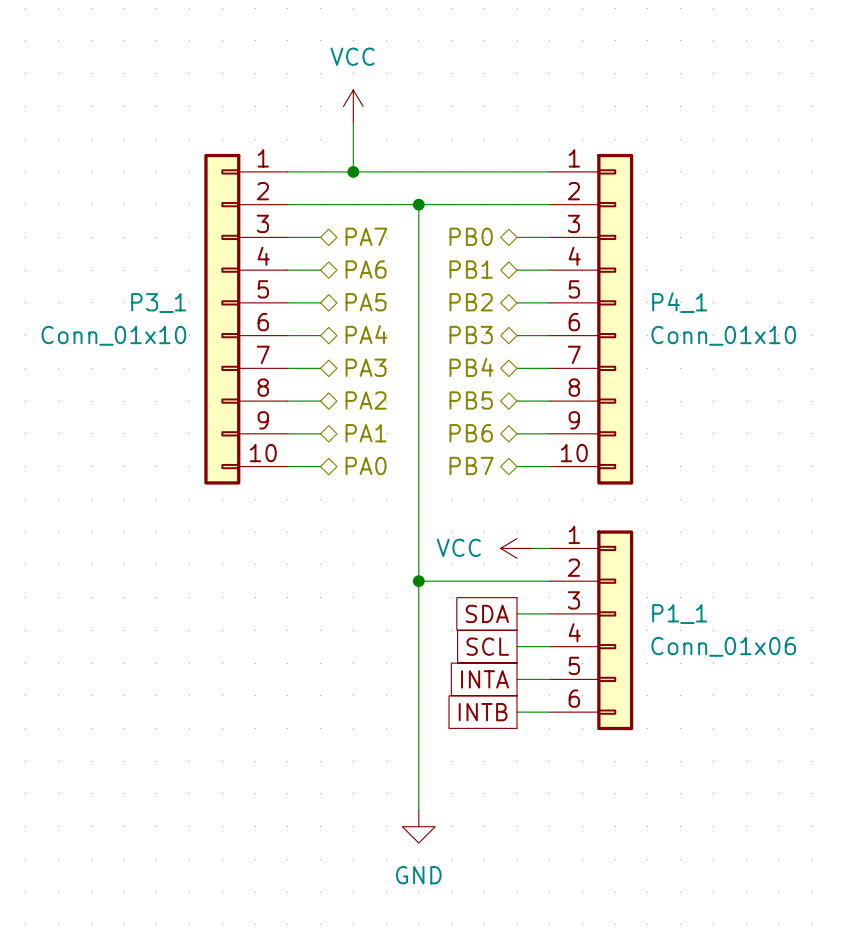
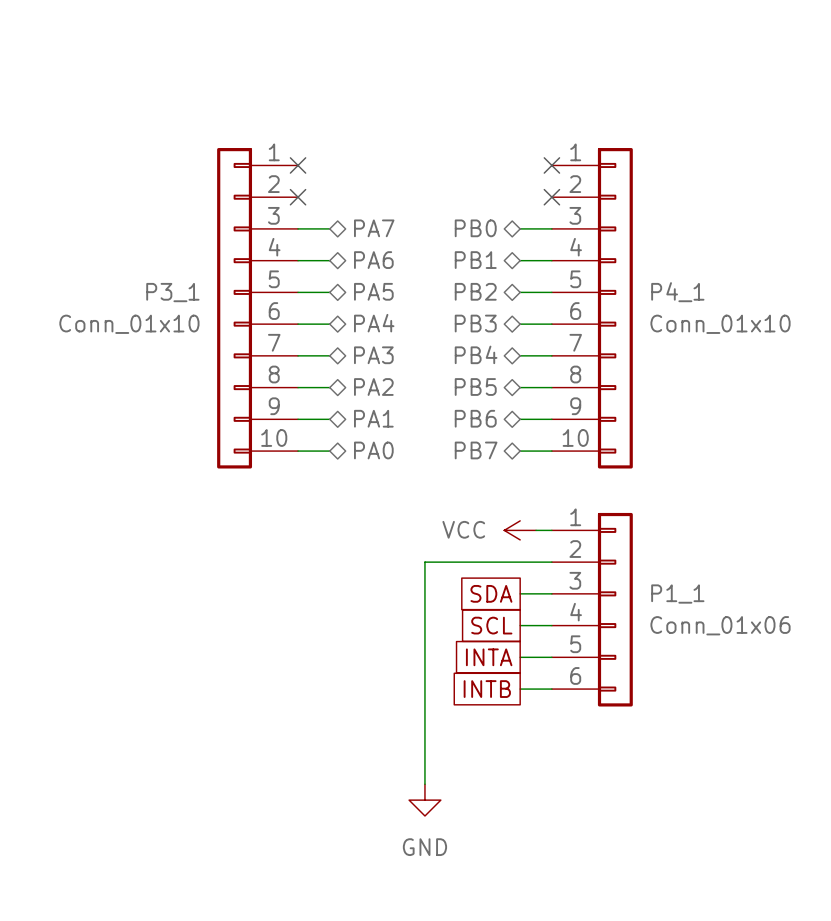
power symbol: VCC (353, 106) -> none
wire: (353, 122) (353, 171) -> none
wire: (287, 171) (549, 171) -> none
no-connect mark: none -> (298, 165)
junction: (353, 171) -> none
no-connect mark: none -> (551, 165)
wire: (287, 204) (549, 204) -> none
no-connect mark: none -> (298, 197)
wire: (418, 204) (418, 581) -> none
junction: (418, 204) -> none
no-connect mark: none -> (551, 197)
junction: (418, 581) -> none

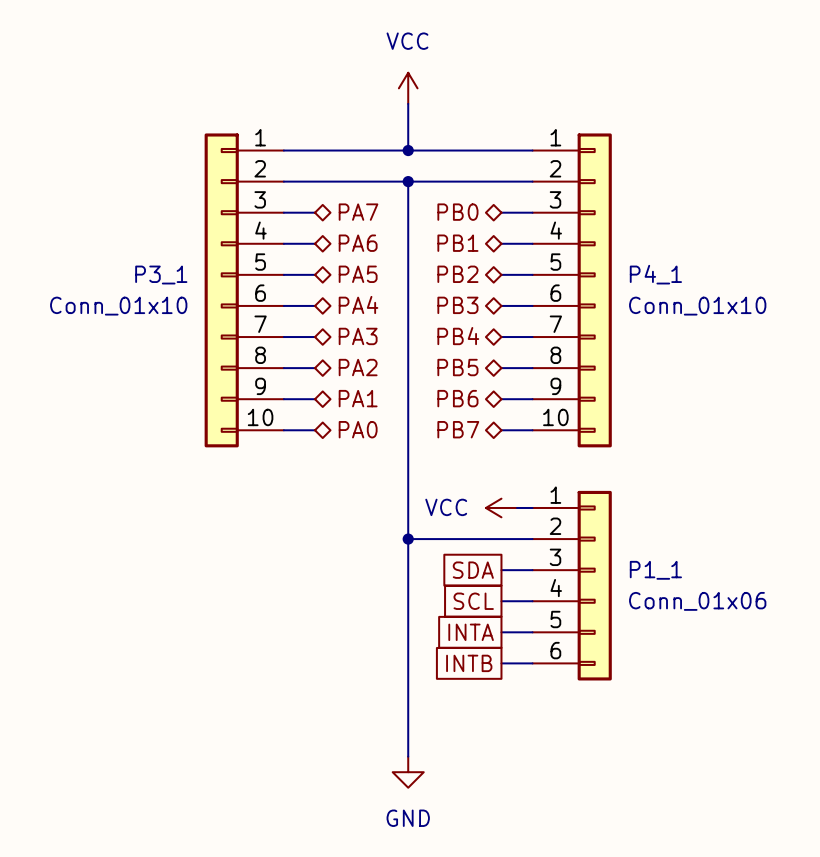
power symbol: none -> VCC (408, 88)
wire: none -> (408, 103) (408, 150)
wire: none -> (283, 150) (532, 150)
no-connect mark: (298, 165) -> none
junction: none -> (408, 150)
no-connect mark: (551, 165) -> none
wire: none -> (283, 181) (532, 181)
no-connect mark: (298, 197) -> none
wire: none -> (408, 181) (408, 539)
junction: none -> (408, 181)
no-connect mark: (551, 197) -> none
junction: none -> (408, 539)

